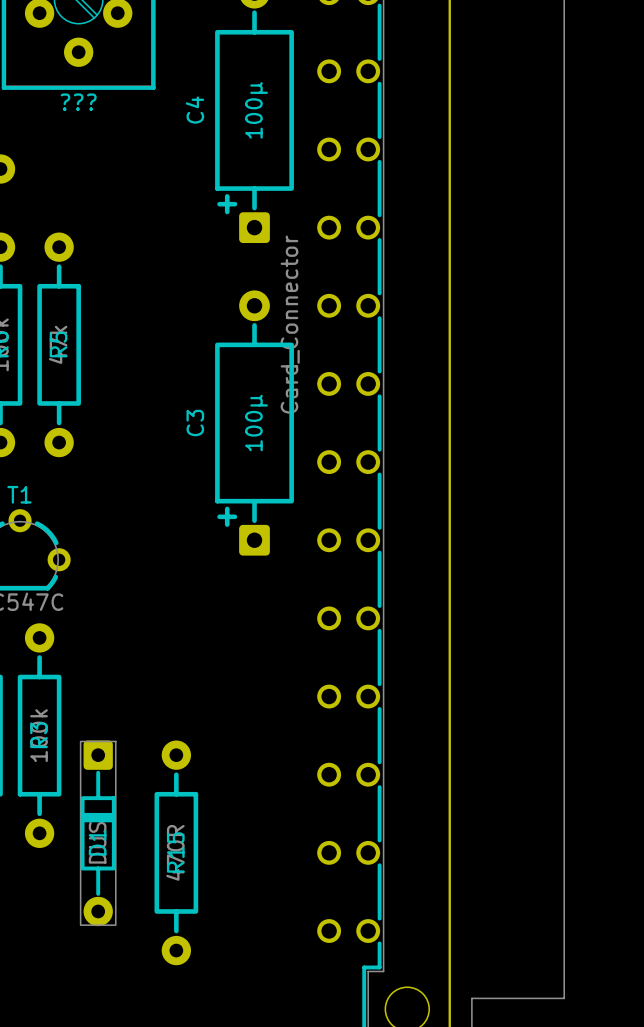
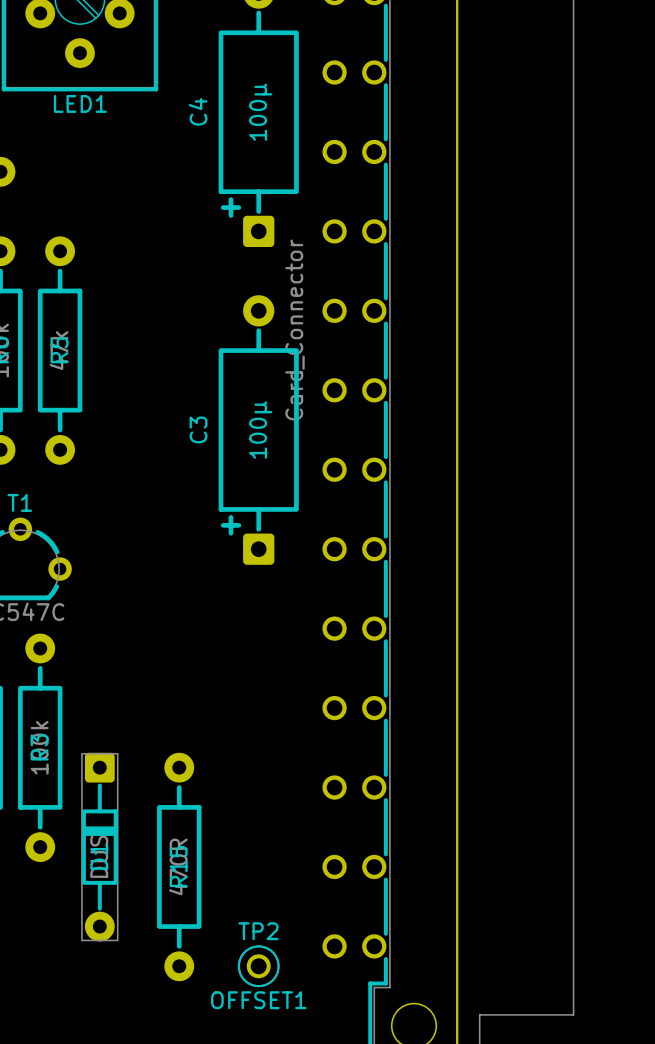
part text: ??? (78, 102) -> LED1 (80, 103)
TP2: none -> OFFSET1 (258, 966)

